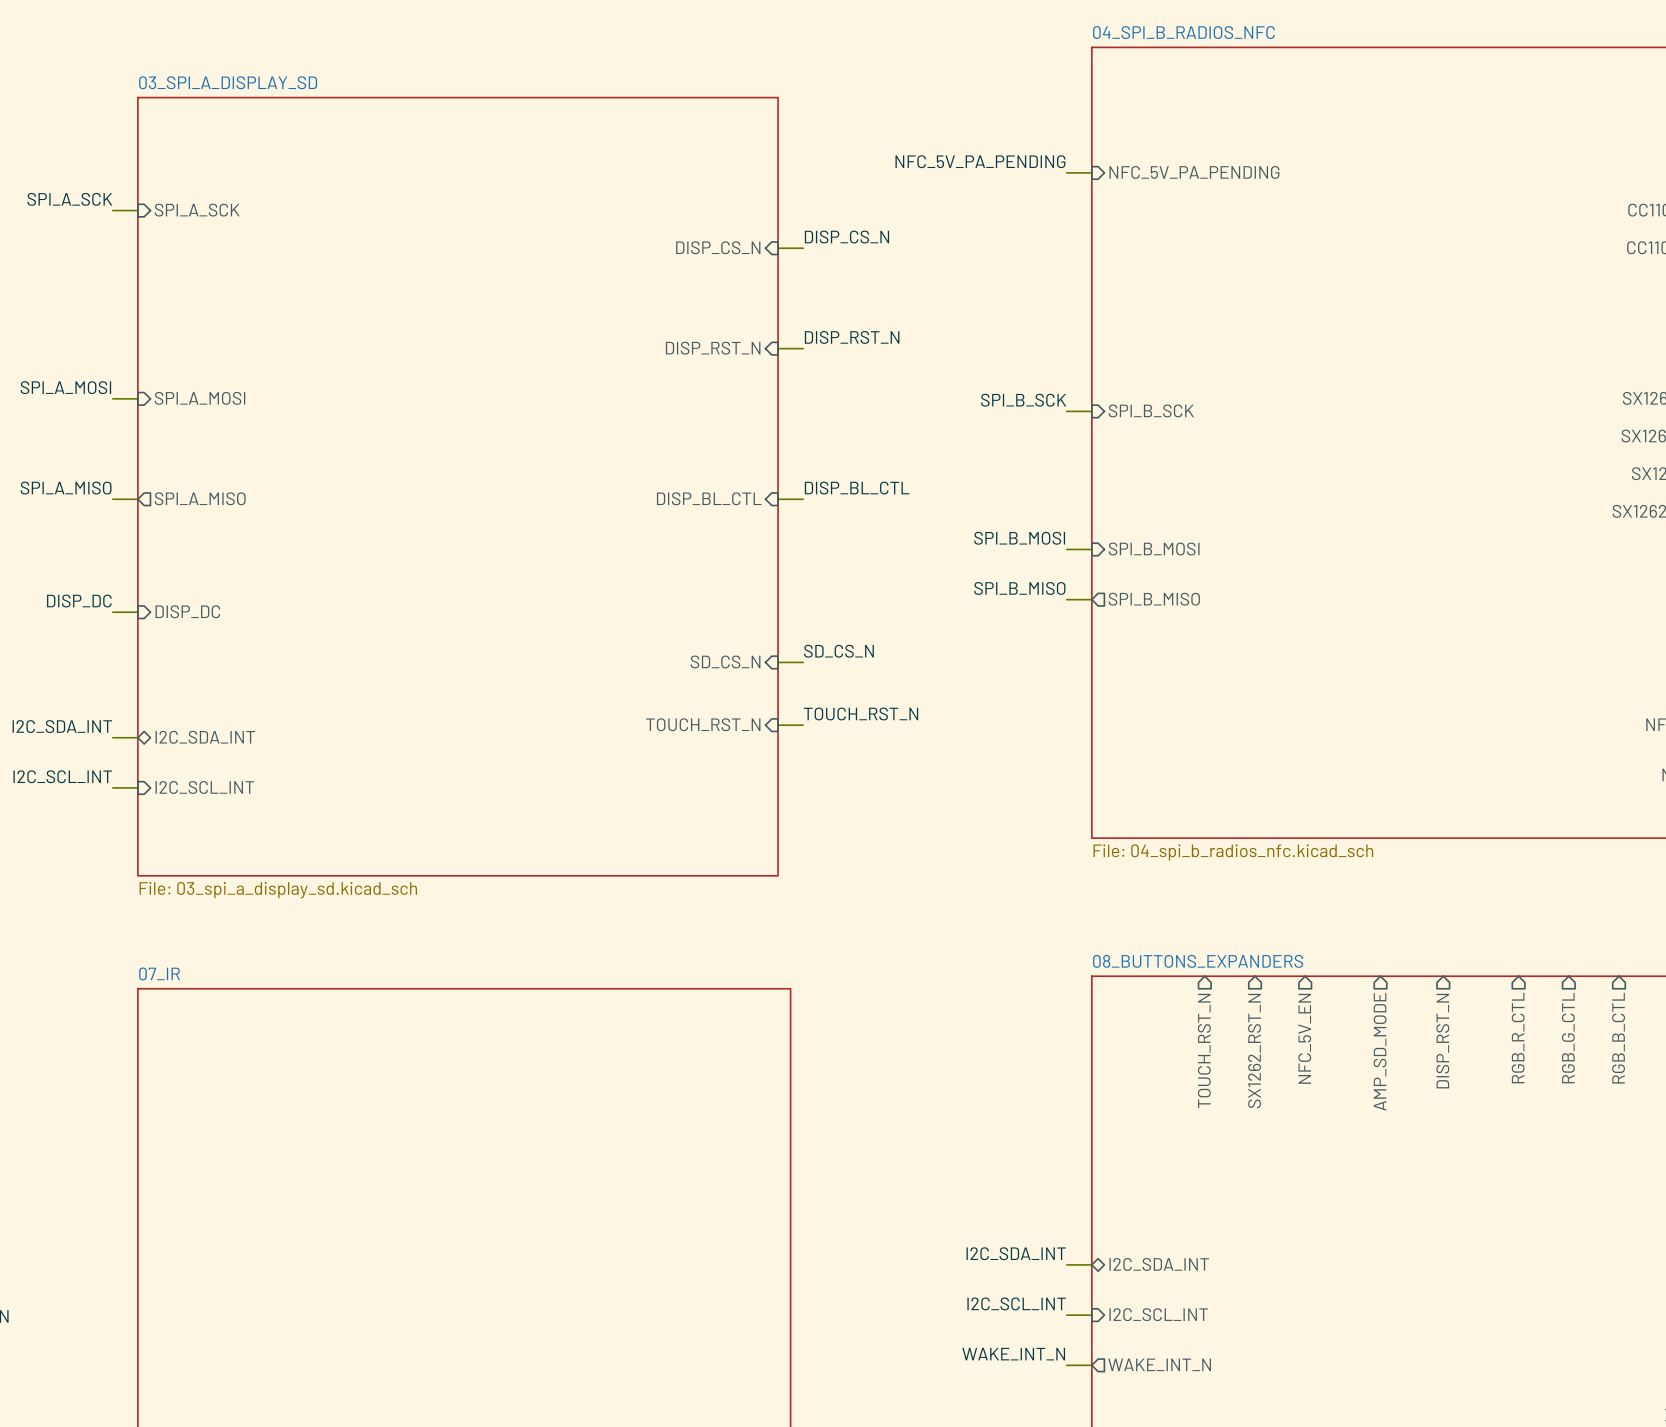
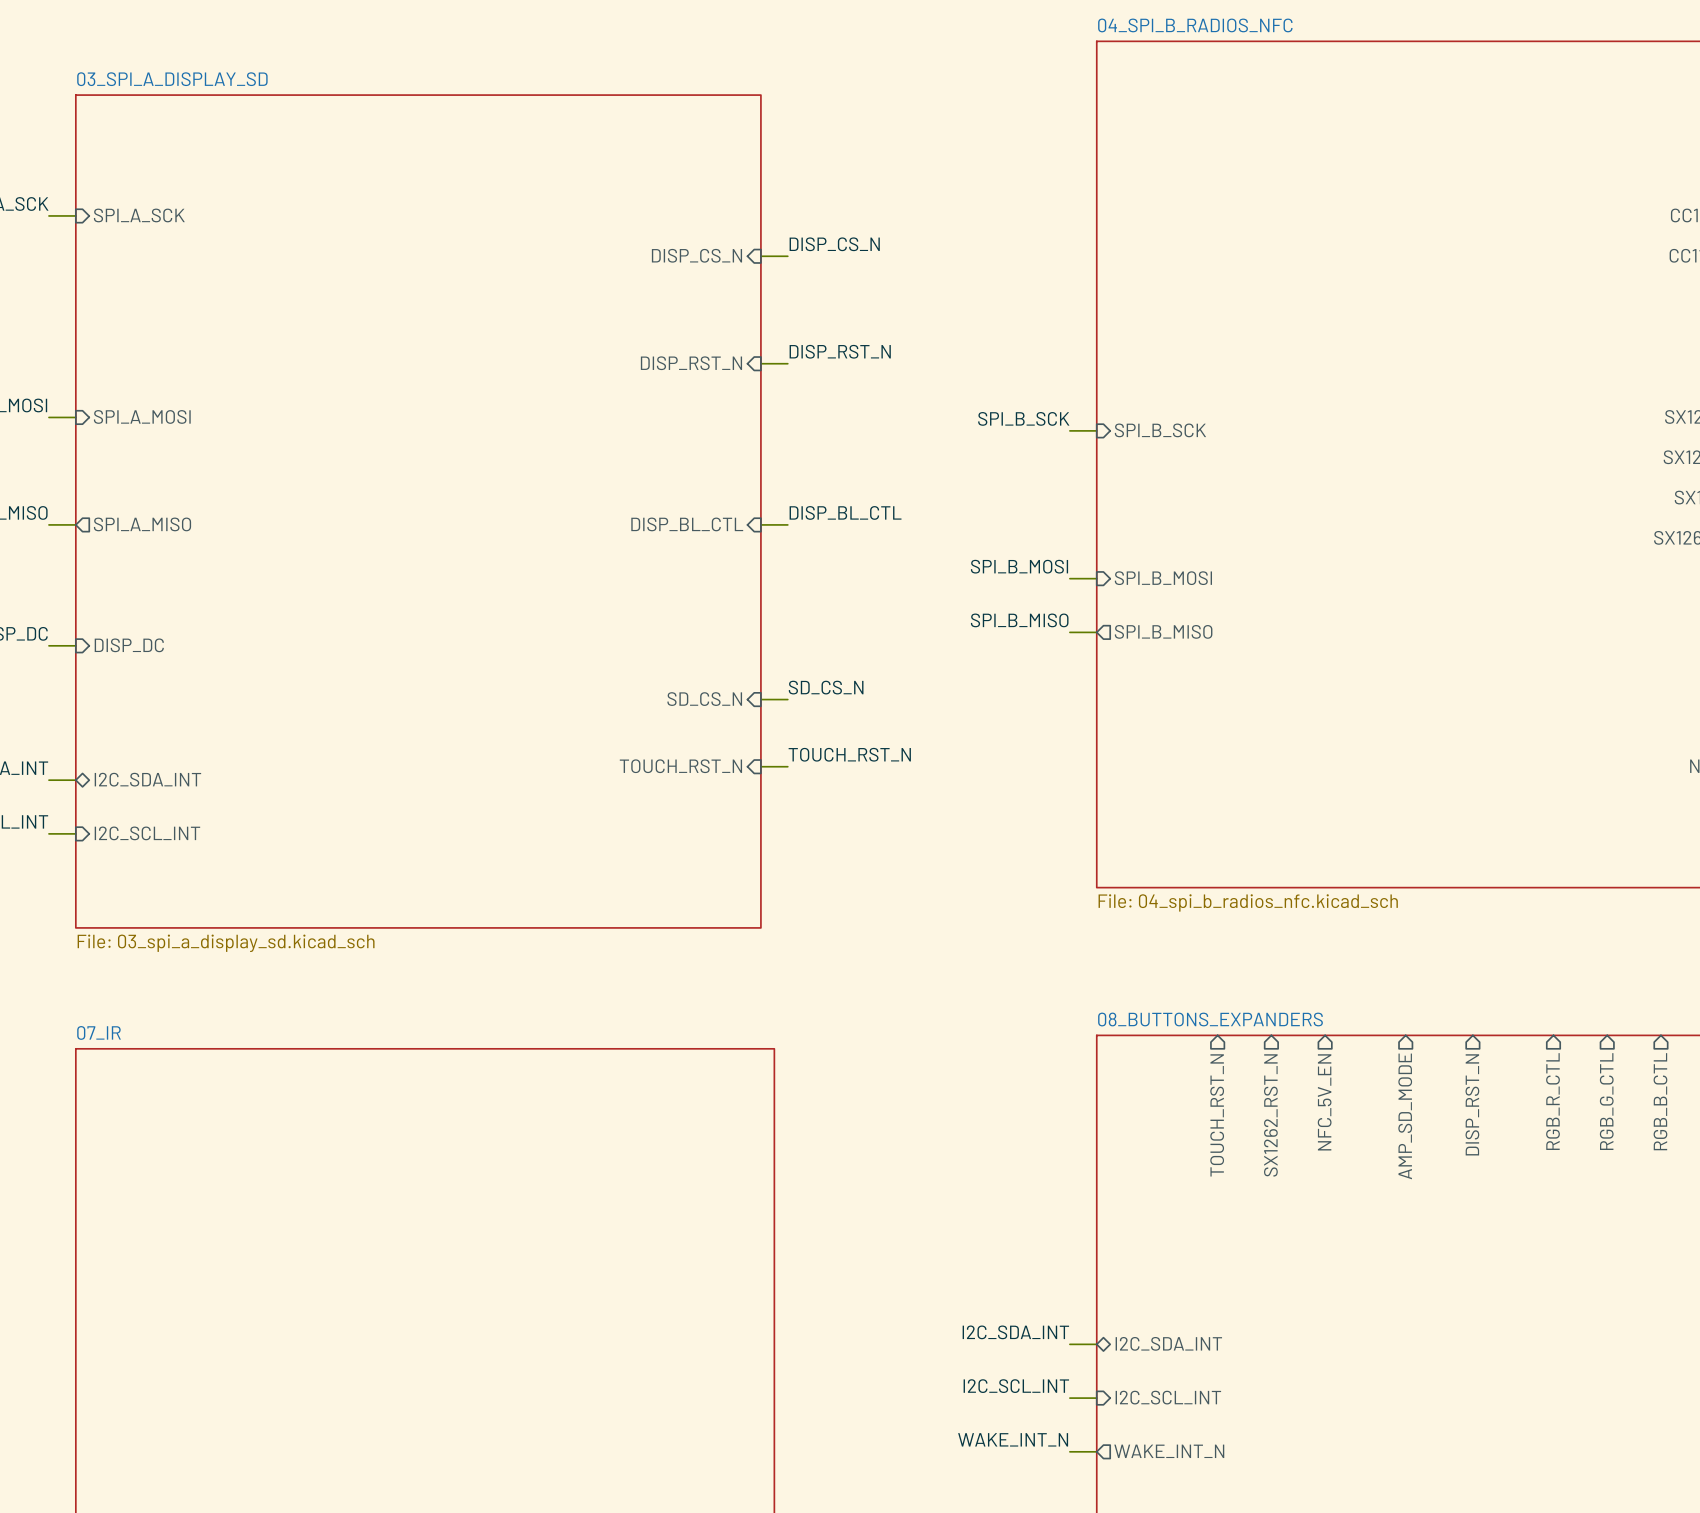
label: NFC_5V_PA_PENDING (980, 161) -> none
wire: (1066, 172) (1091, 172) -> none
sheet pin: NFC_5V_PA_PENDING (1194, 172) -> none

